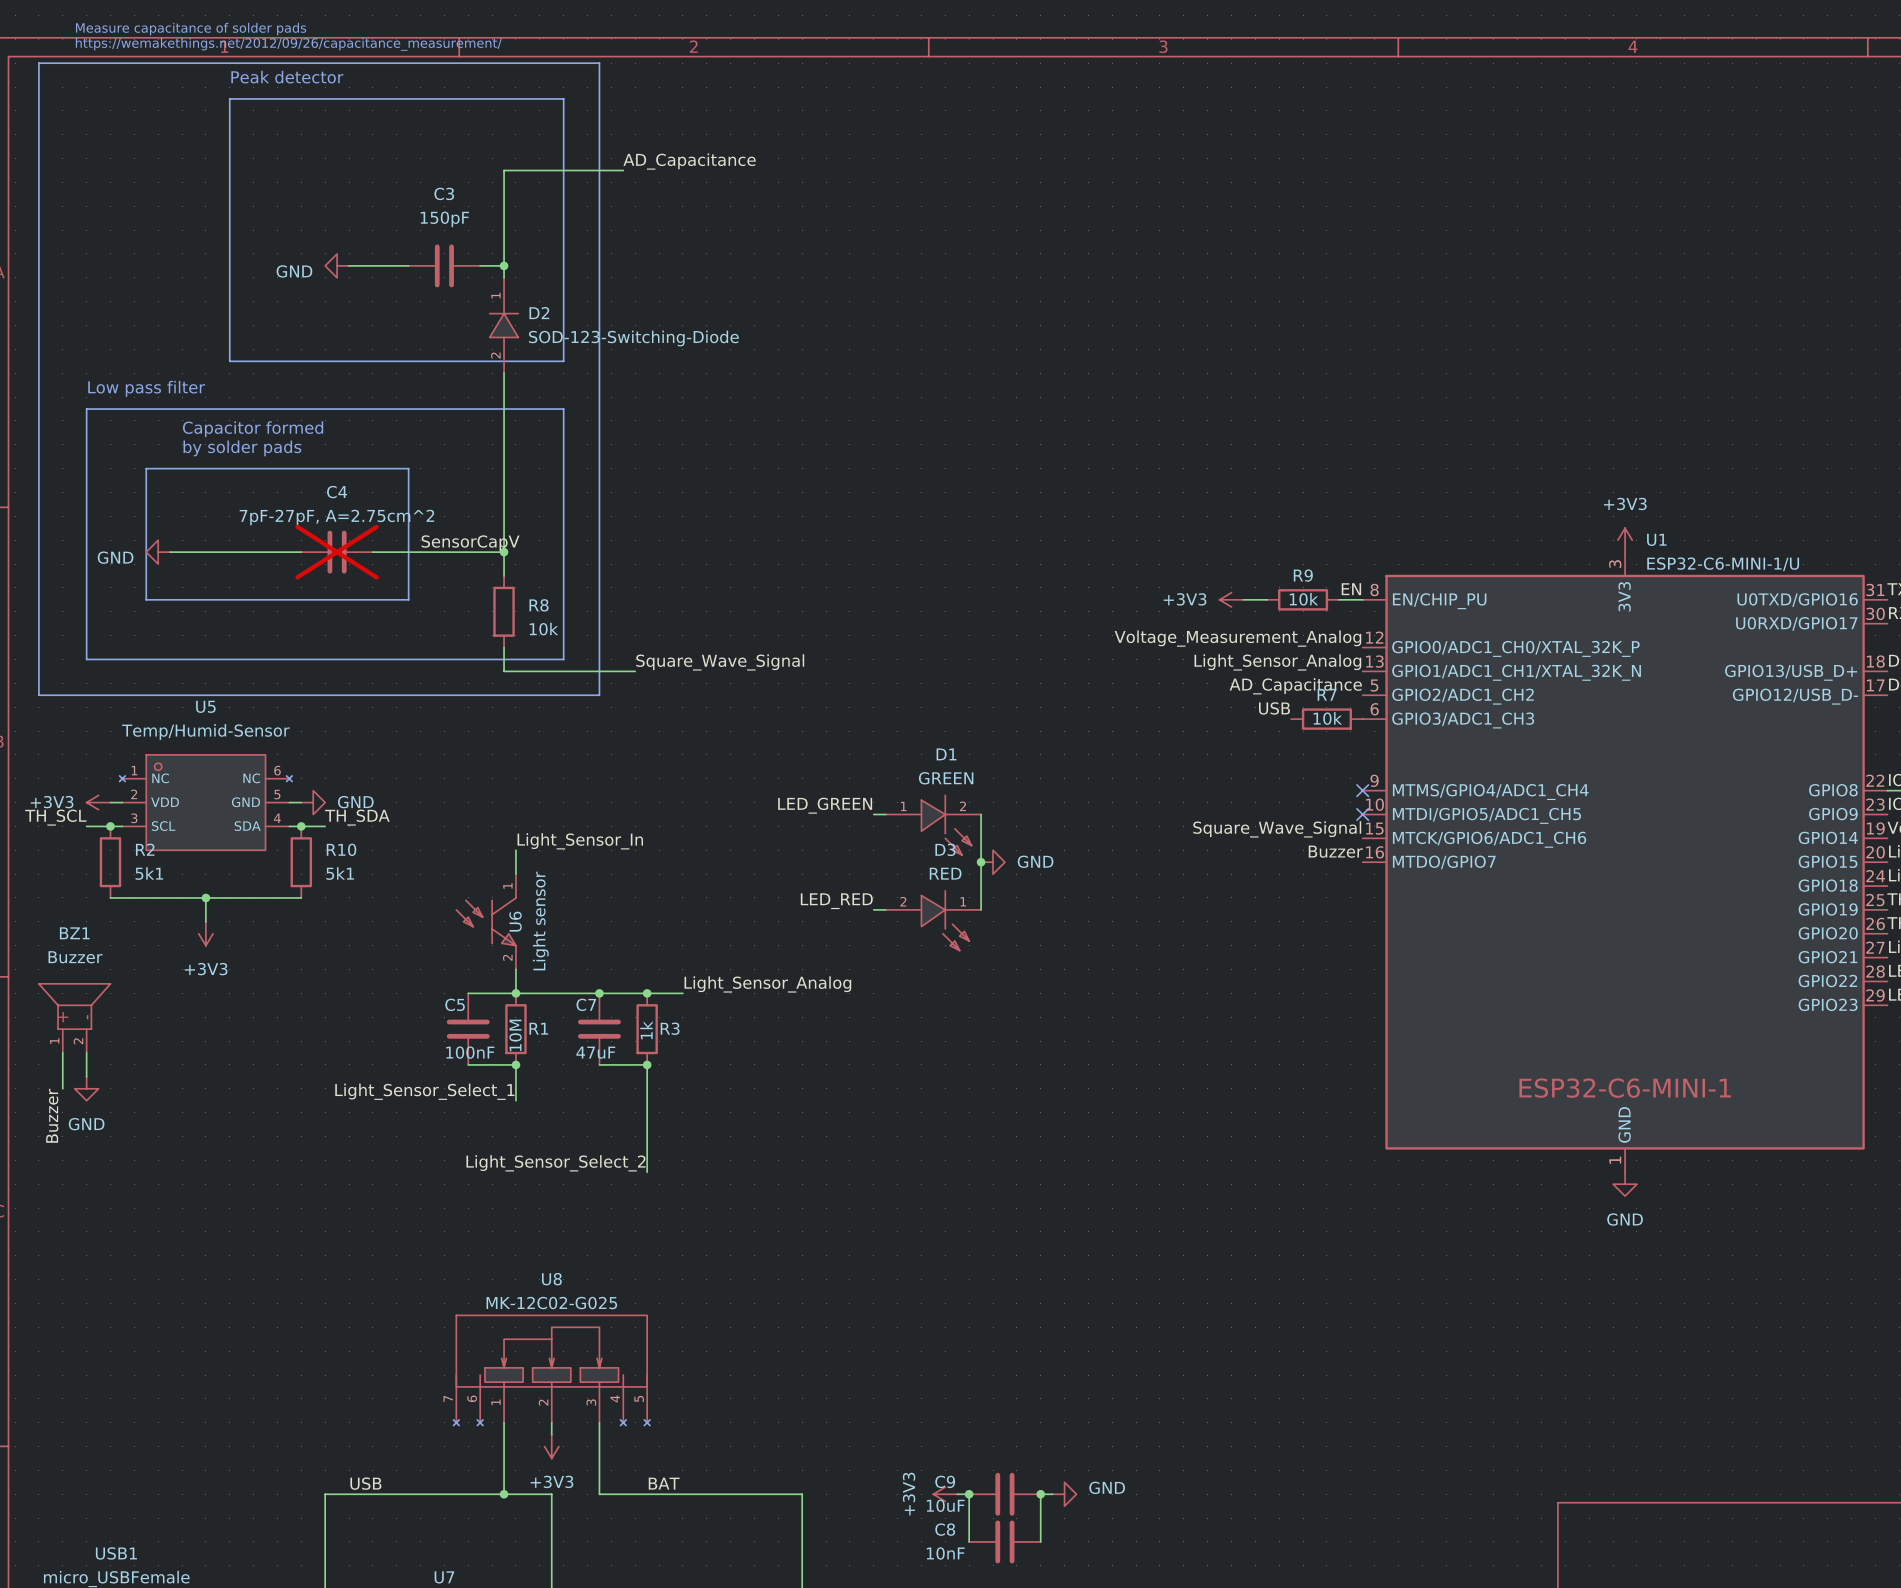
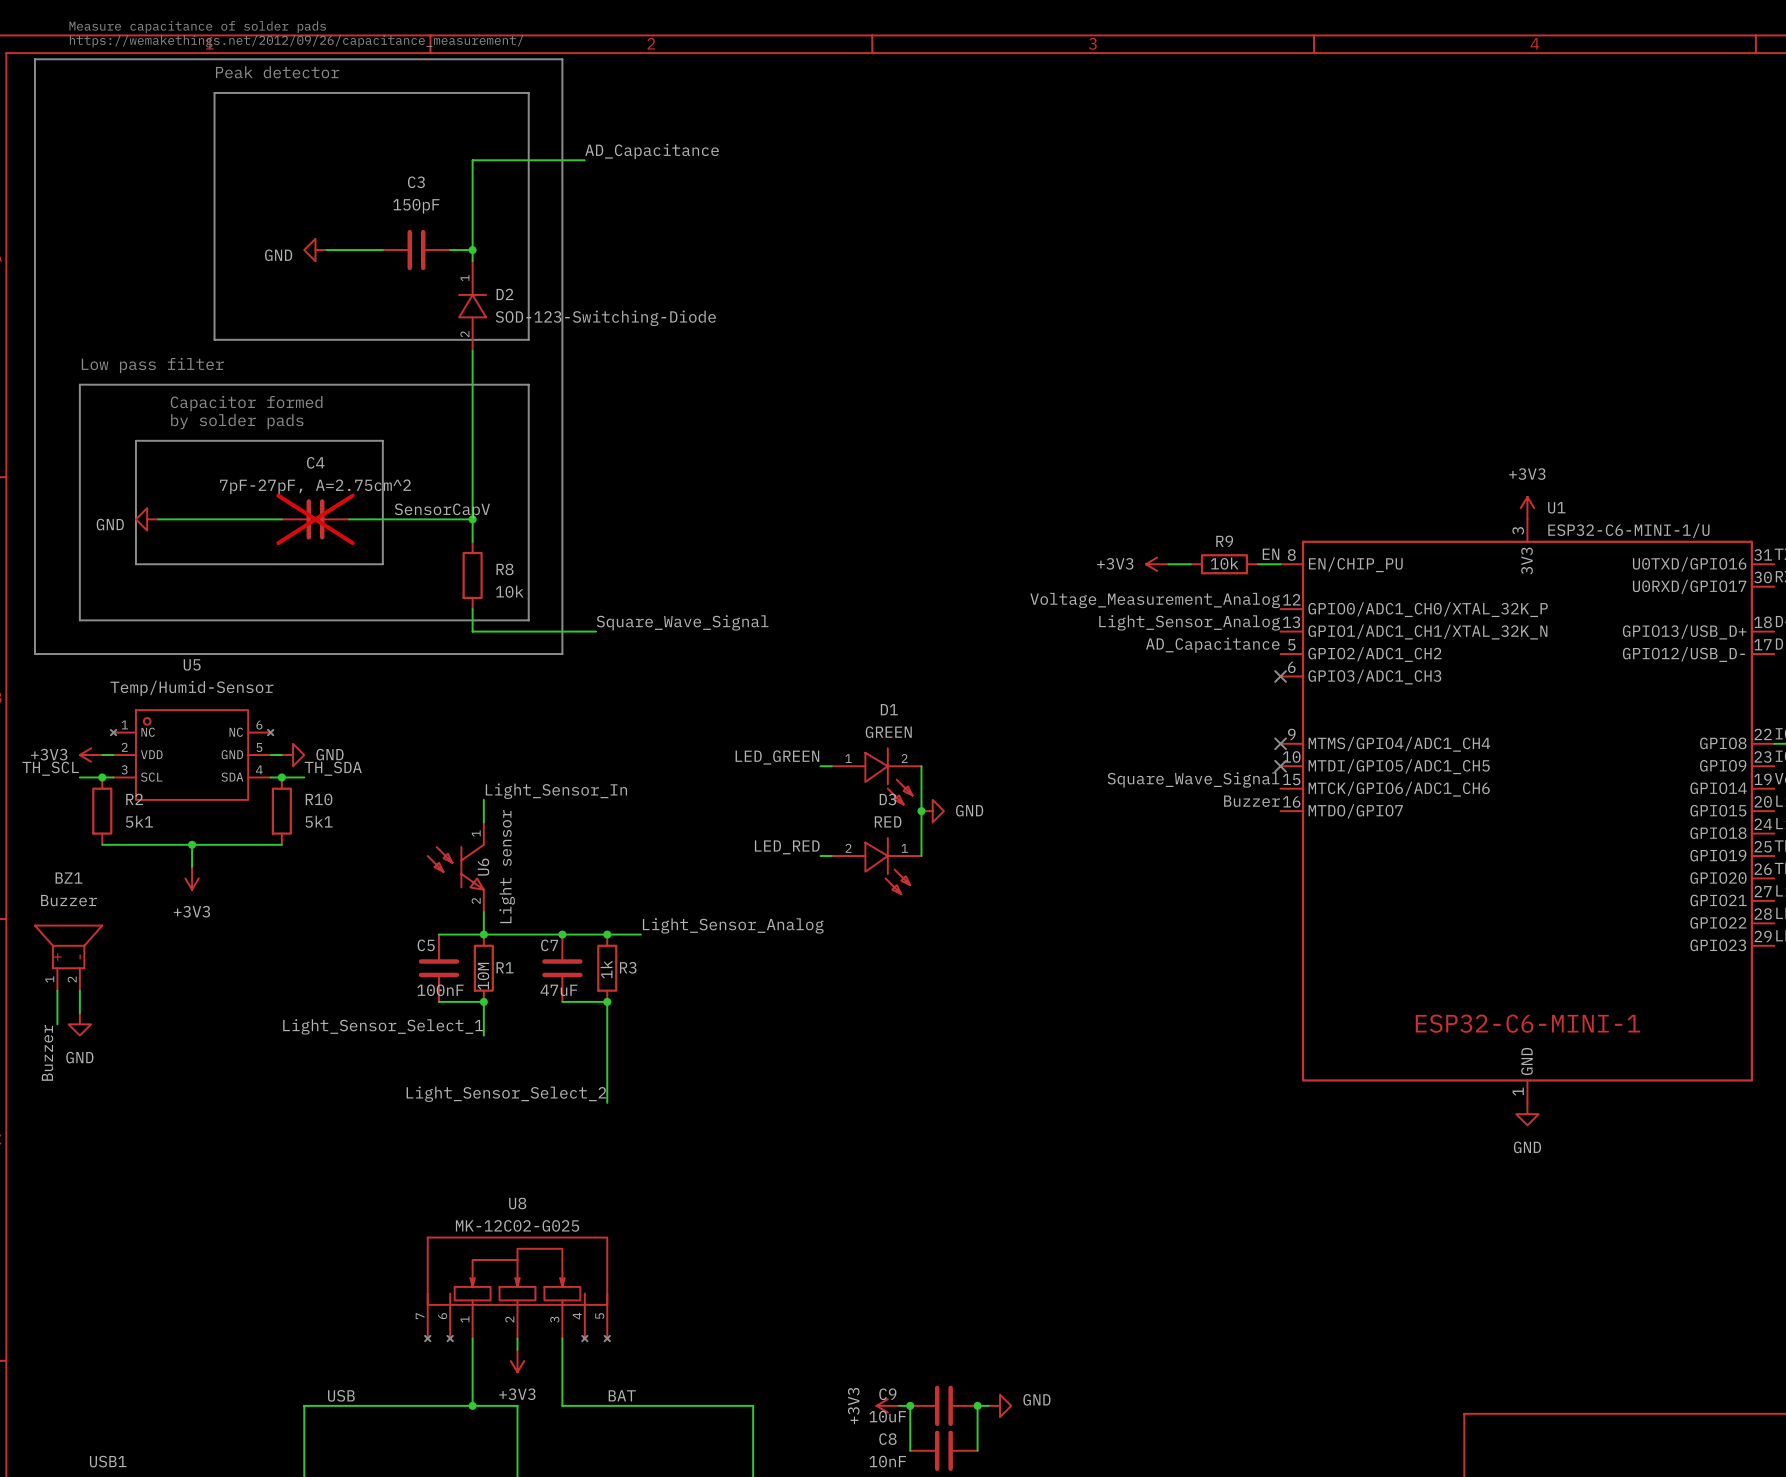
label: USB (1274, 708) -> none
R7: 10k (1326, 719) -> none
no-connect mark: none -> (1280, 676)

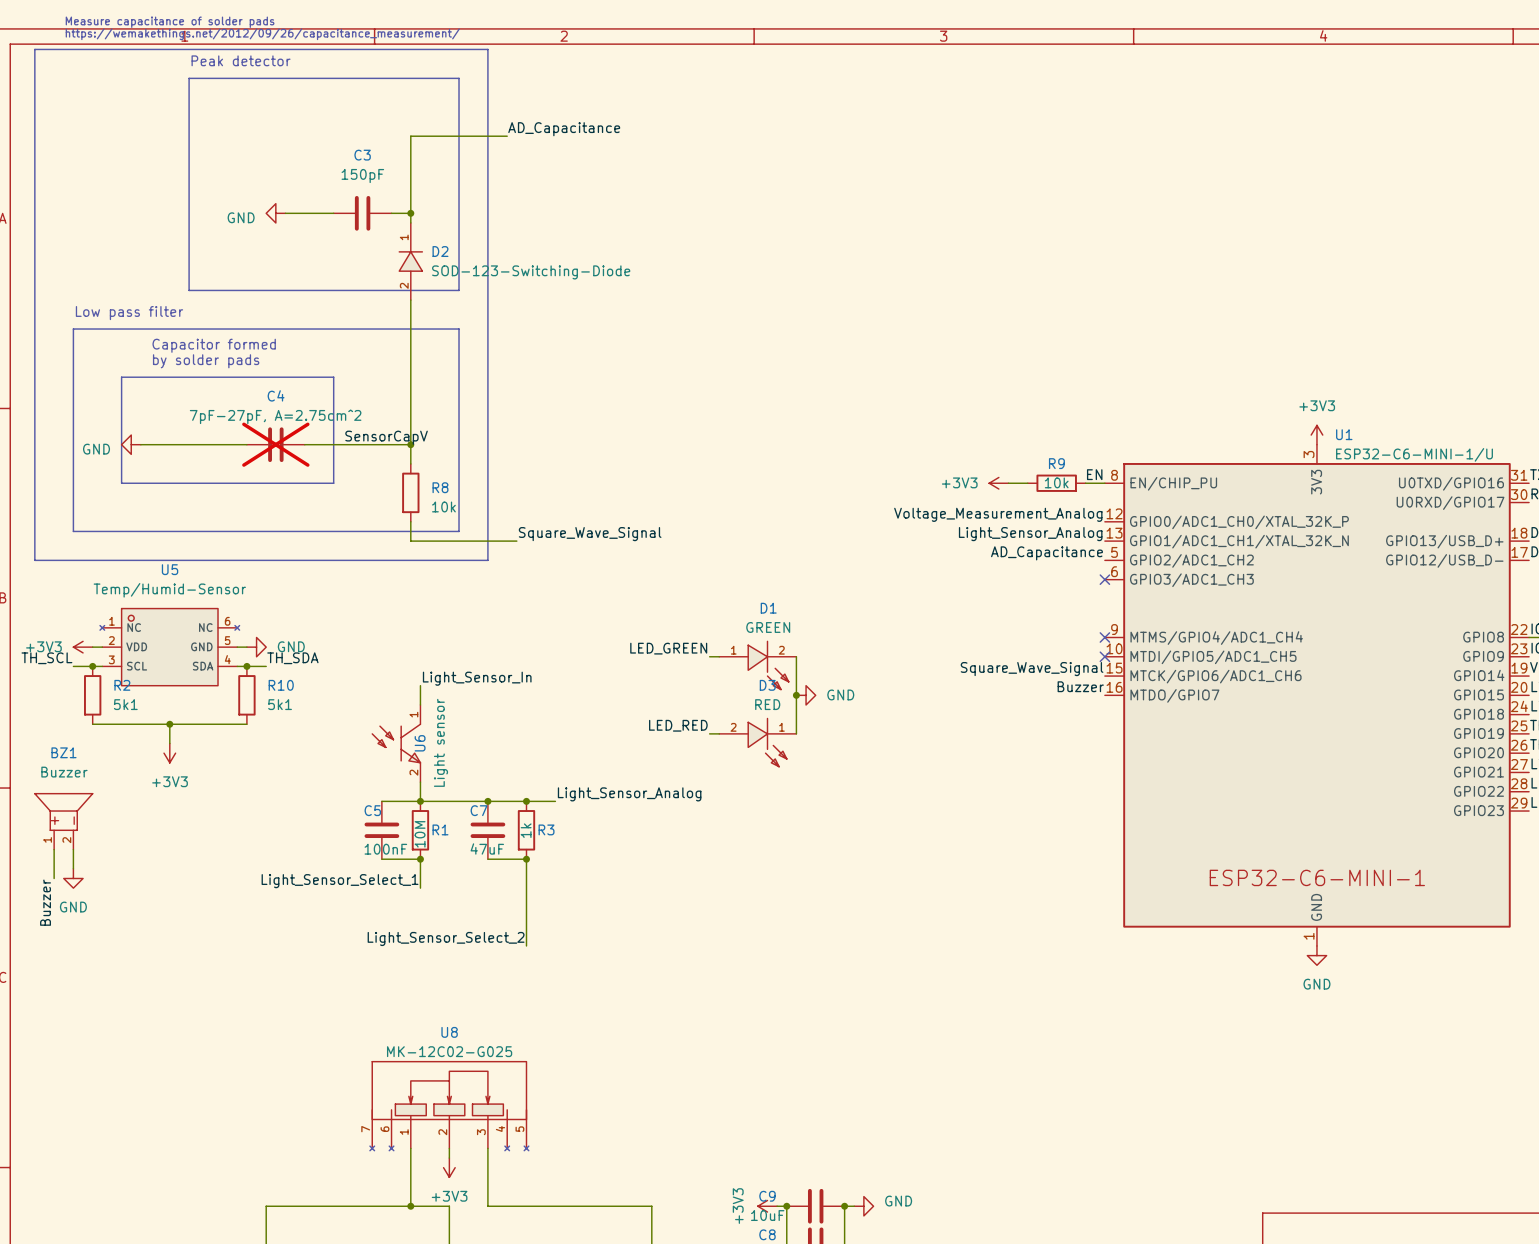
label: USB (341, 1395) -> none
label: BAT (622, 1395) -> none

